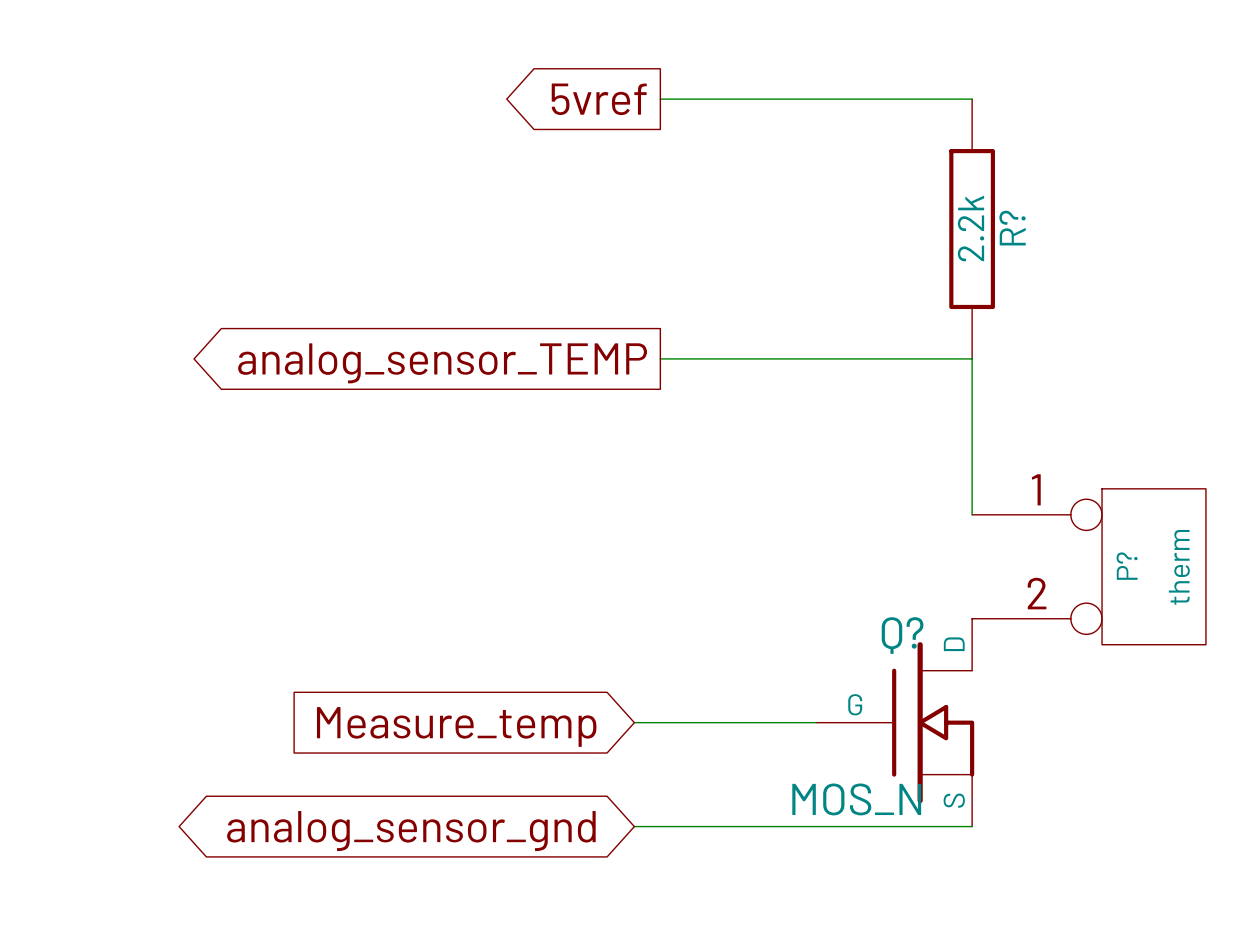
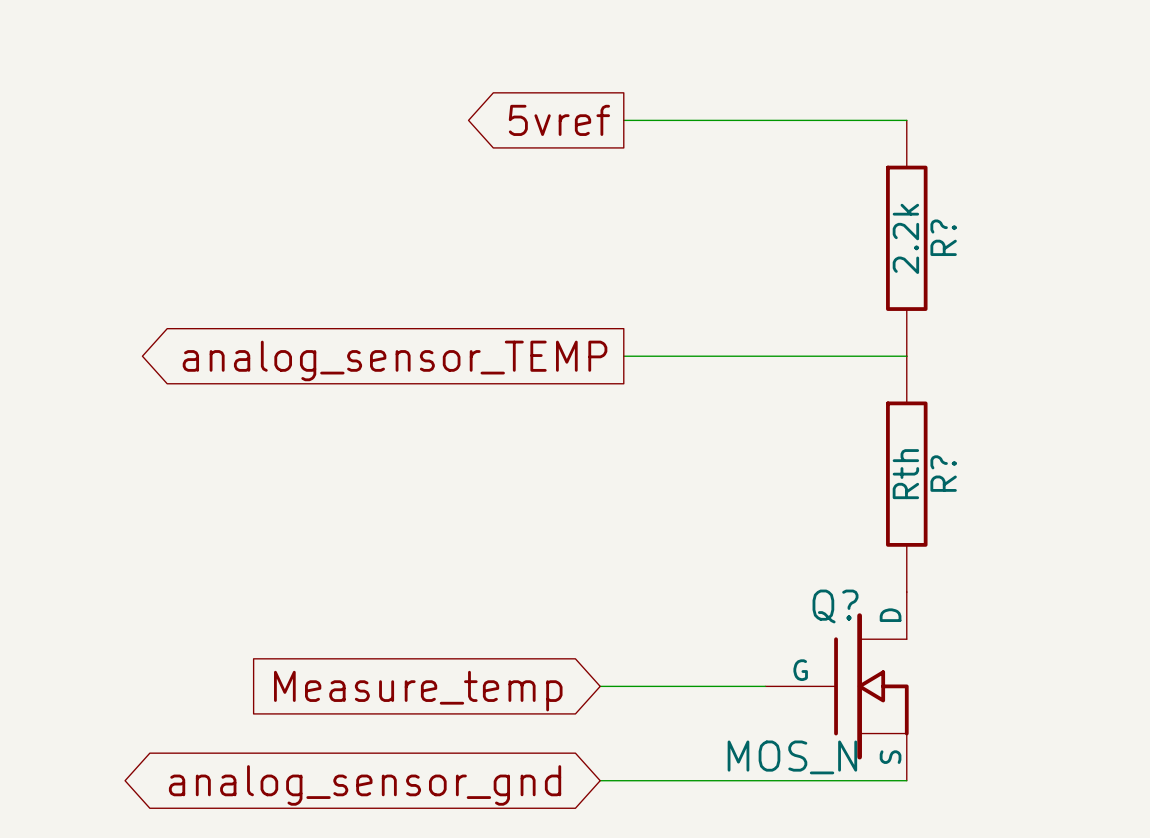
wire: (972, 358) (972, 514) -> none
R?: none -> Rth (906, 474)
P?: therm (1089, 566) -> none

